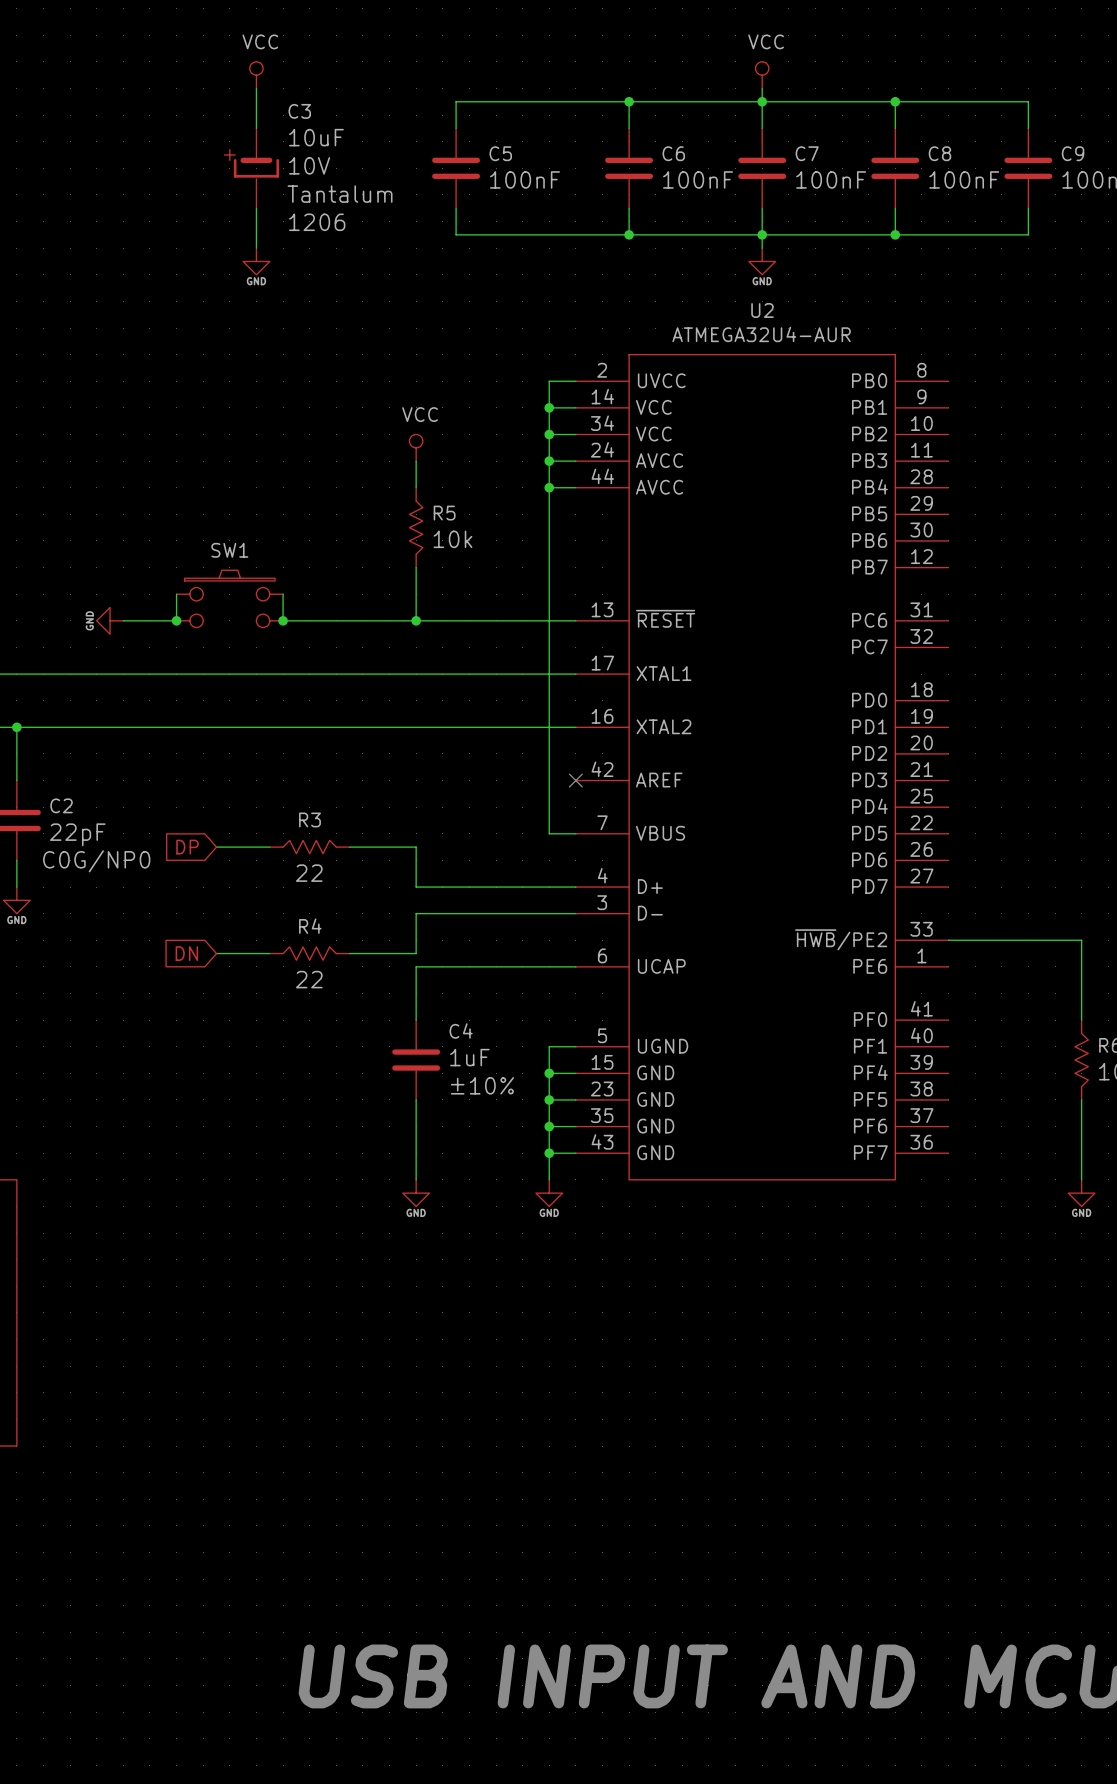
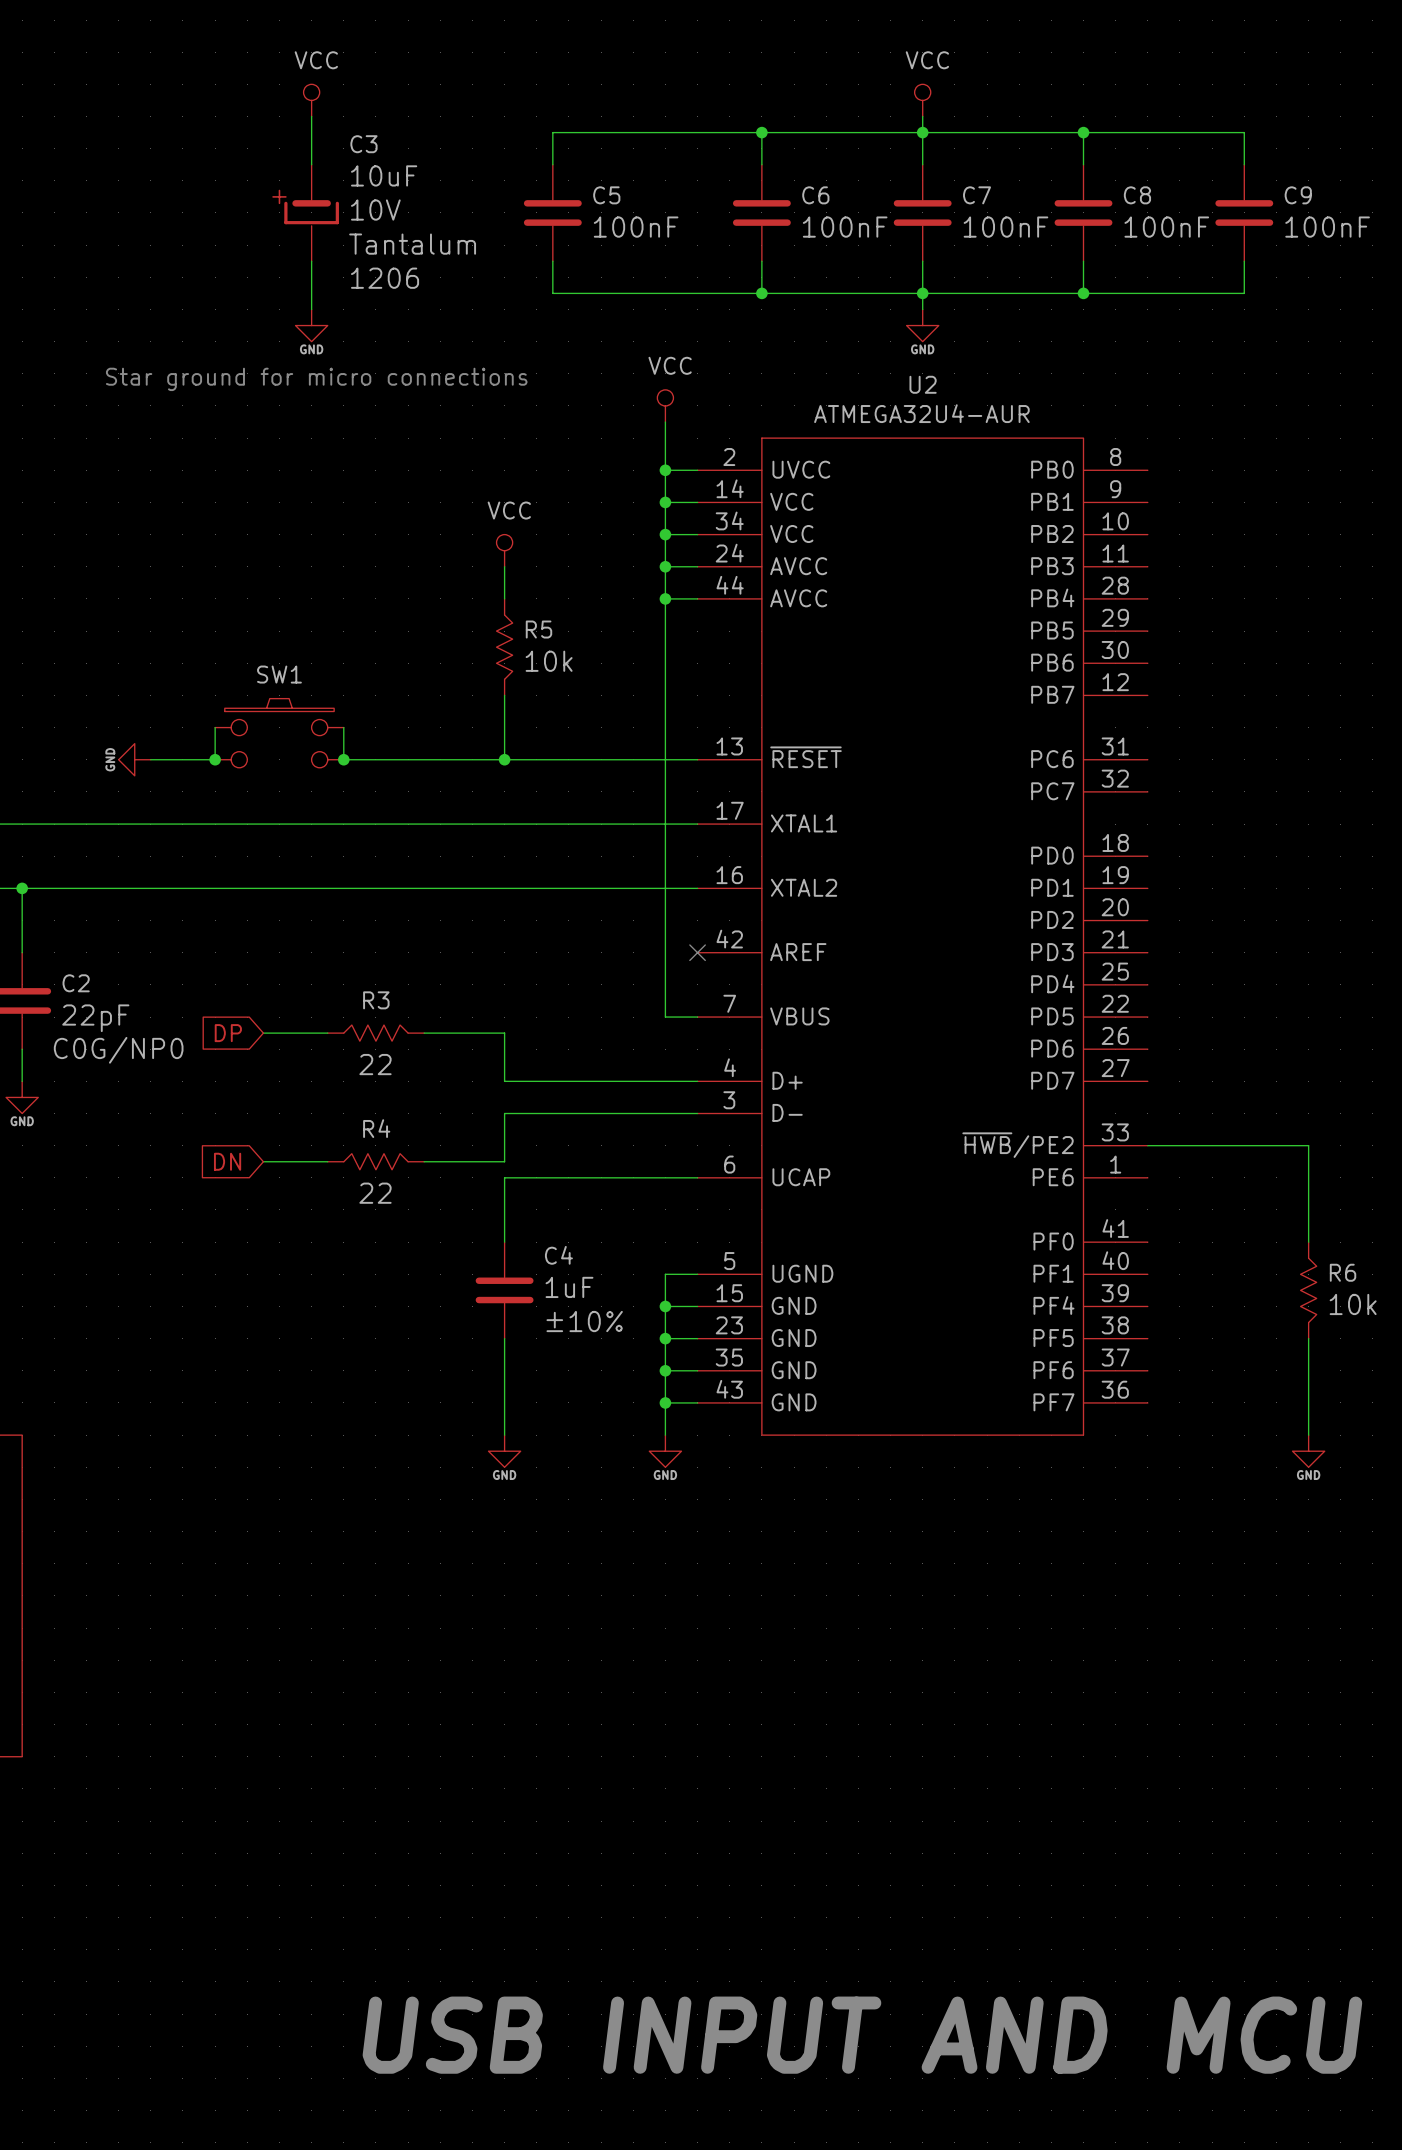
text: none -> Star ground for micro connections (316, 379)
power symbol: none -> VCC (665, 405)
wire: none -> (665, 422) (665, 470)
junction: none -> (665, 470)

